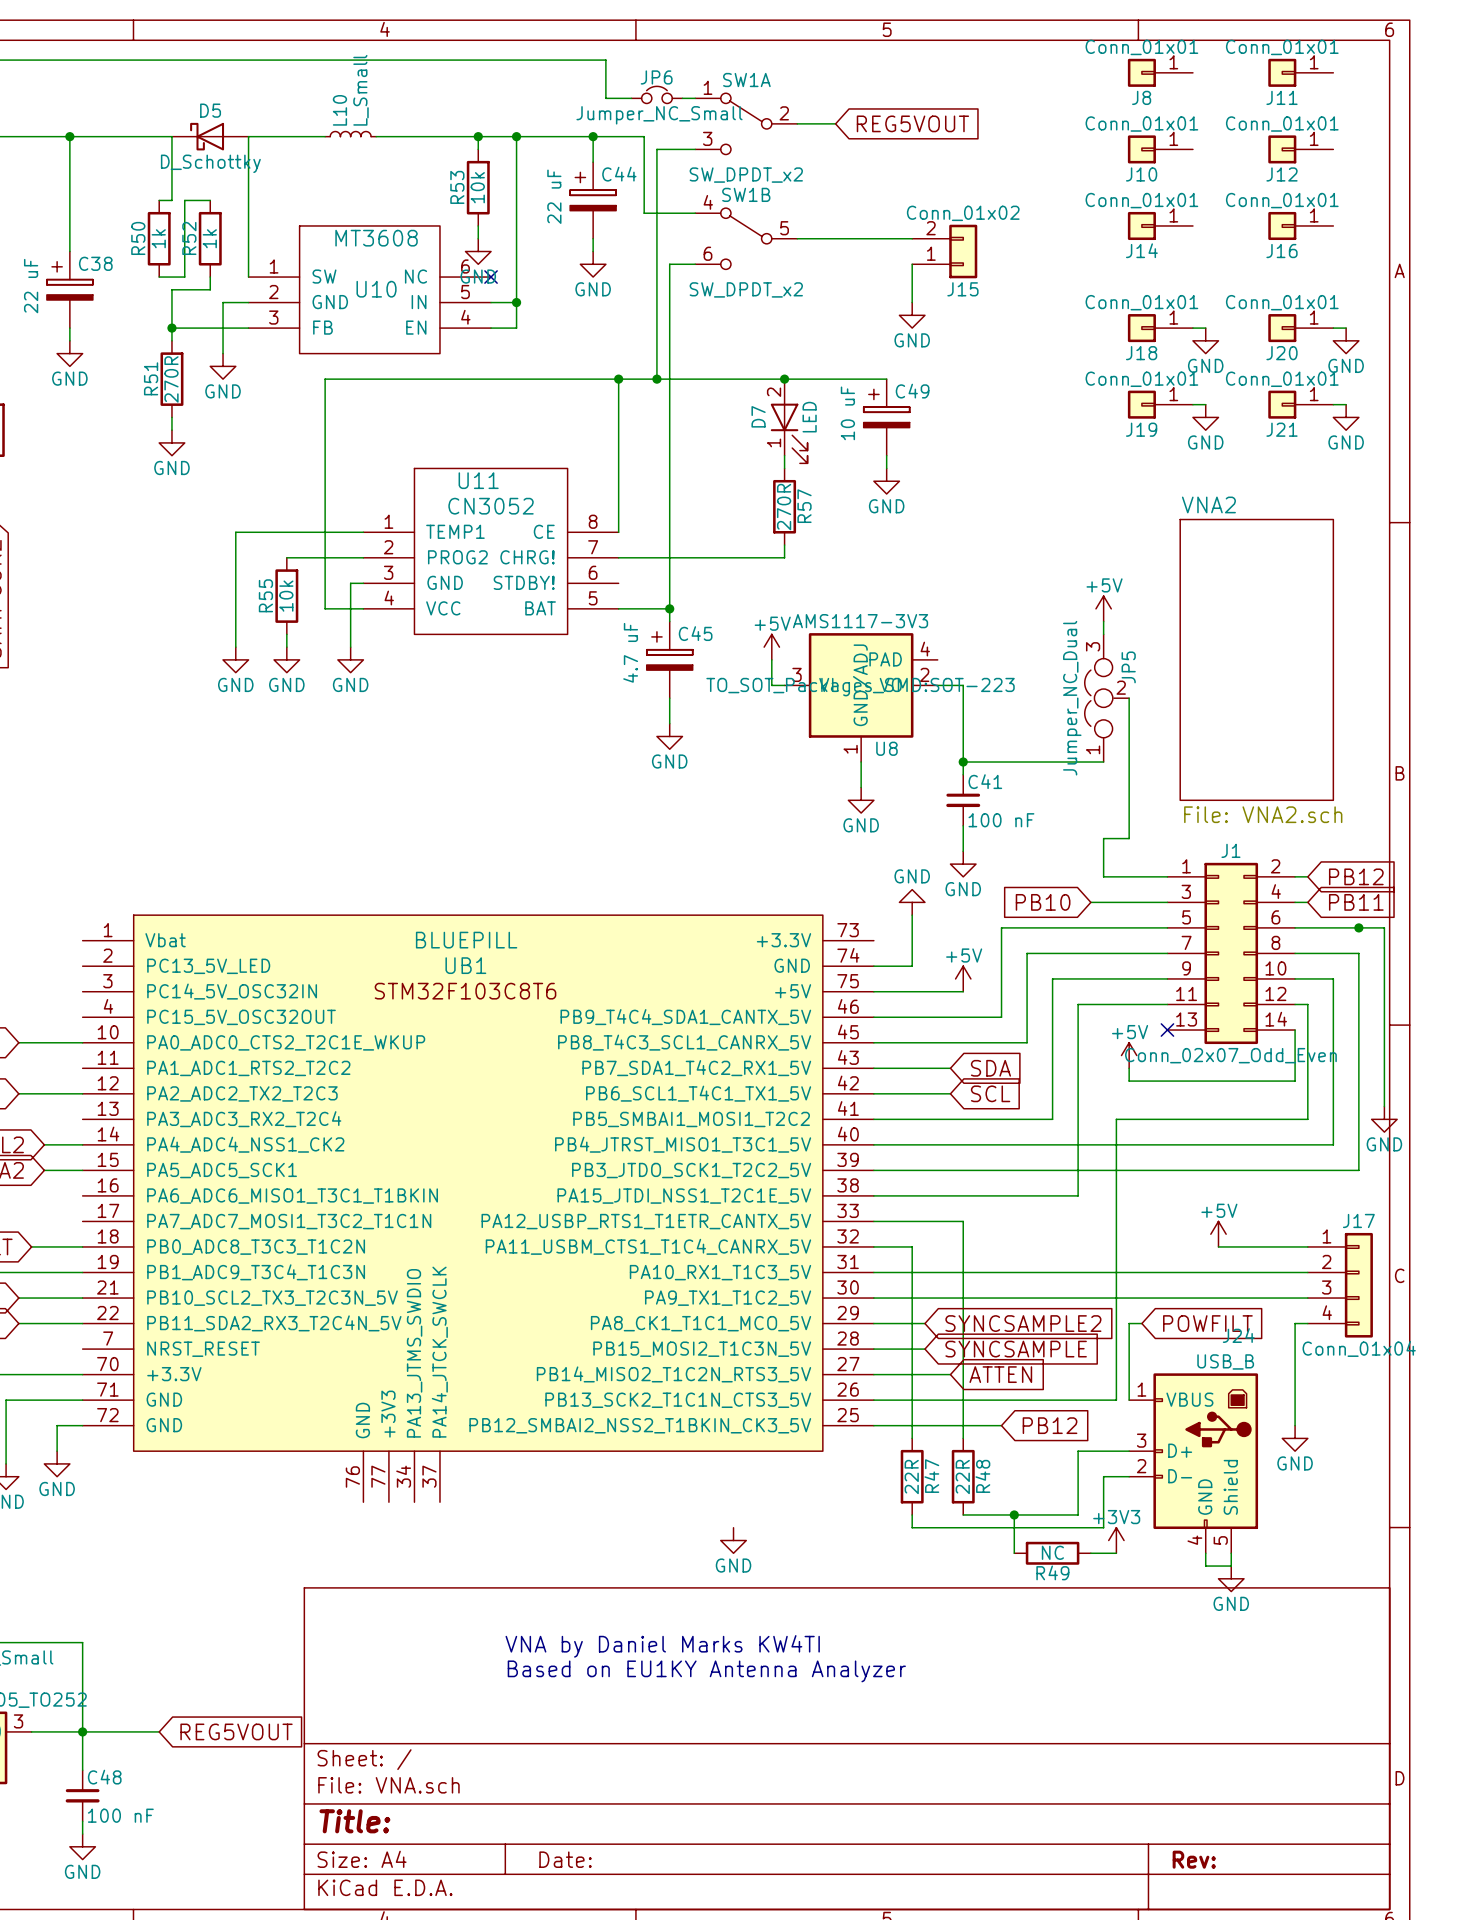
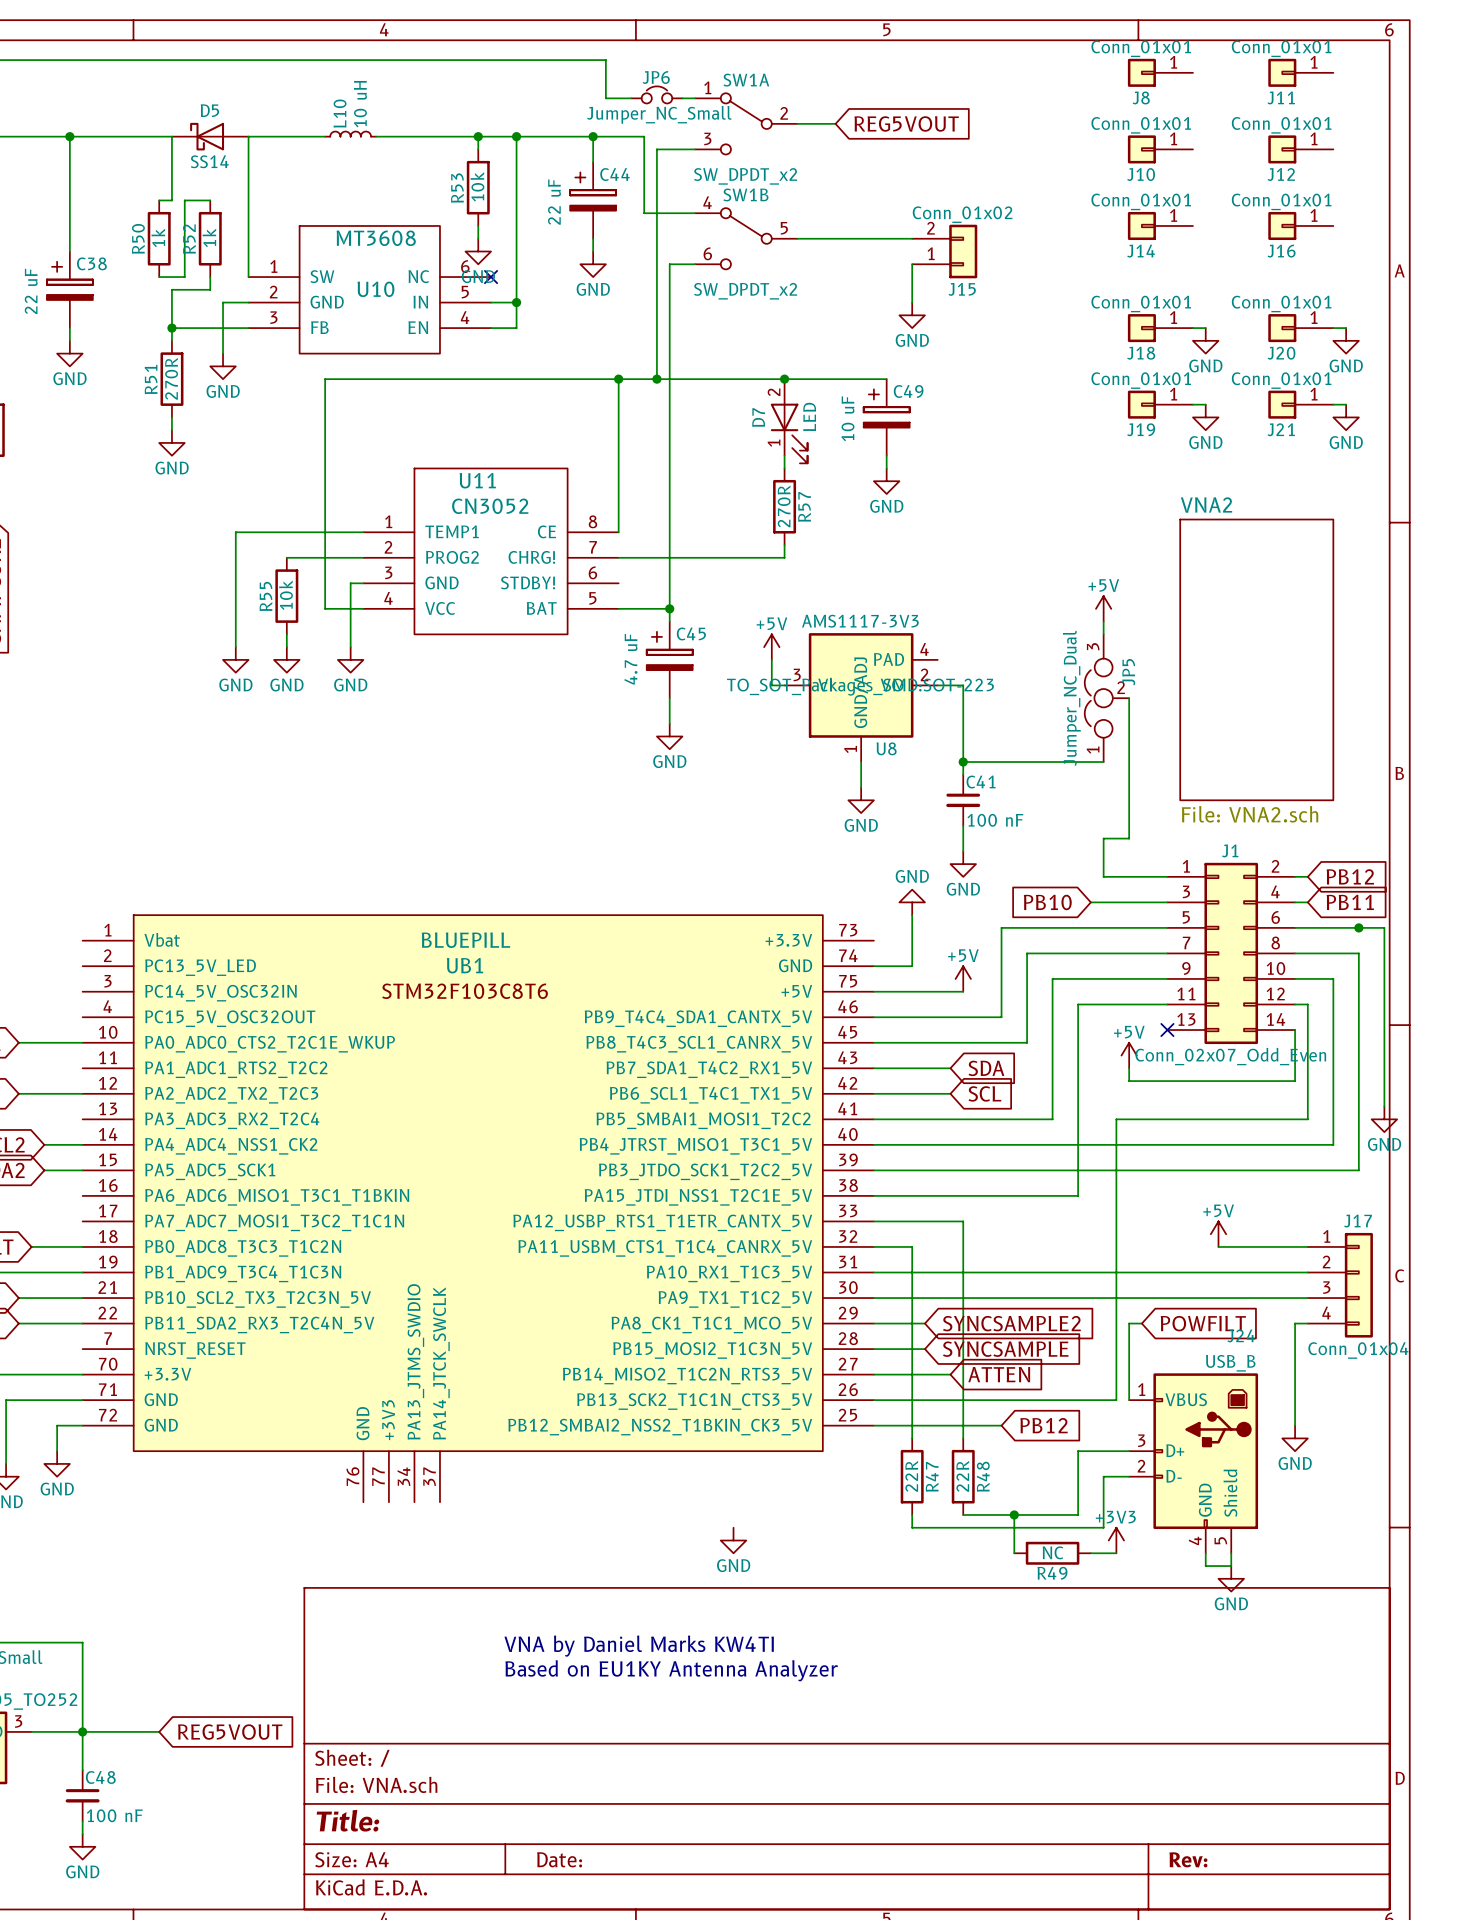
L10 value: L_Small (360, 90) -> 10 uH (360, 104)
D5 value: D_Schottky (210, 163) -> SS14 (209, 161)

